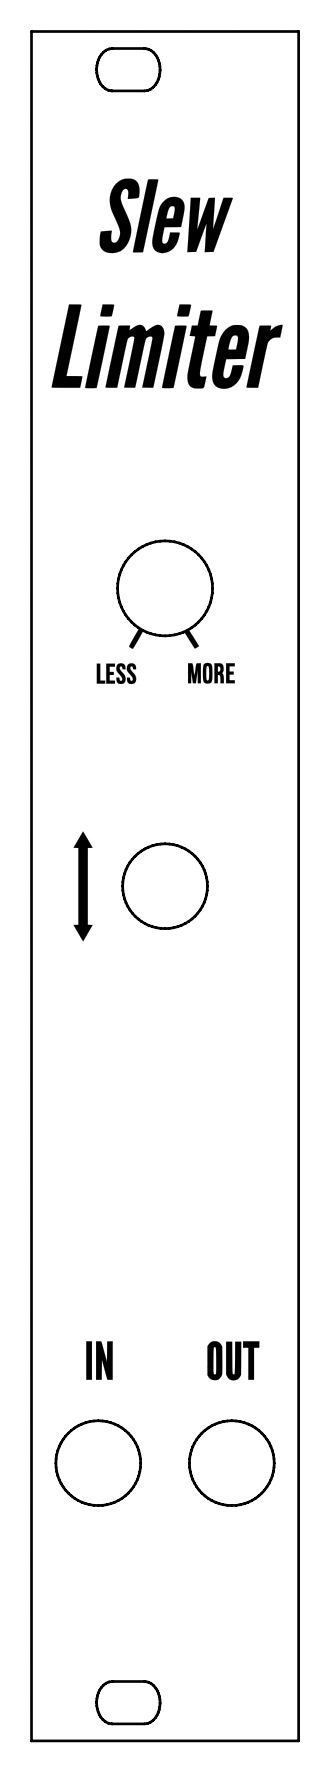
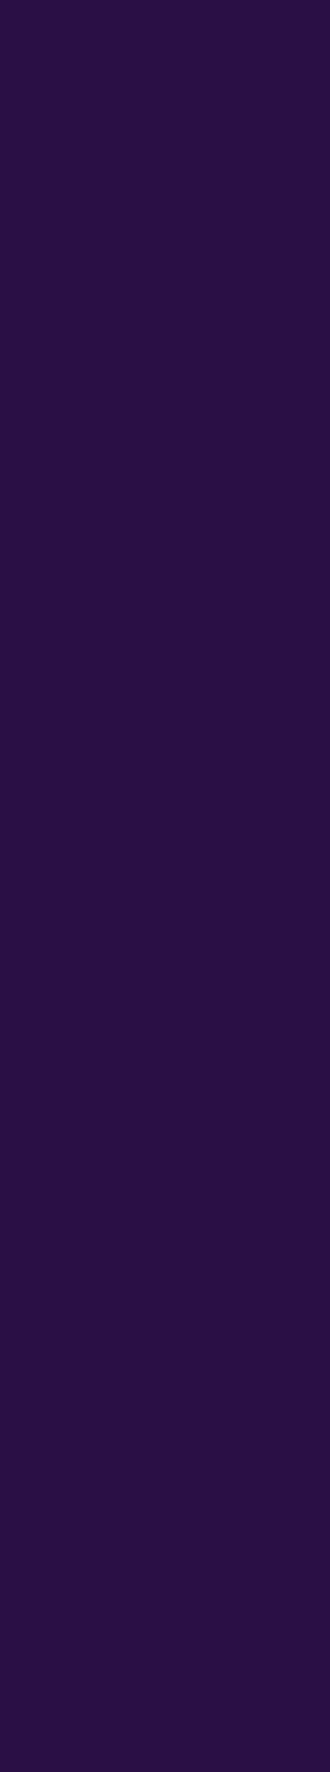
board edge: (31, 31) (298, 31) (298, 1740) (31, 1740) (31, 31) -> none
board edge: (112, 48) (145, 48) (153, 52) (159, 66) (159, 77) (155, 84) (150, 89) (144, 90) (111, 90) (102, 86) (97, 76) (97, 62) (103, 52) (112, 48) -> none
drawing: [51, 178, 283, 1381] -> none
board edge: (165, 540) (146, 544) (131, 554) (121, 569) (117, 588) (121, 606) (131, 621) (146, 632) (165, 635) (183, 632) (198, 621) (208, 606) (212, 588) (208, 569) (198, 554) (183, 544) (165, 540) -> none
board edge: (165, 843) (181, 847) (195, 856) (204, 869) (207, 886) (204, 902) (195, 916) (181, 925) (165, 928) (148, 925) (135, 916) (125, 902) (122, 886) (125, 869) (135, 856) (148, 847) (165, 843) -> none
board edge: (98, 1420) (114, 1424) (128, 1433) (137, 1446) (140, 1463) (137, 1479) (128, 1493) (114, 1502) (98, 1505) (81, 1502) (68, 1493) (59, 1479) (55, 1463) (59, 1446) (68, 1433) (81, 1424) (98, 1420) -> none
board edge: (231, 1420) (248, 1424) (261, 1433) (270, 1446) (274, 1463) (270, 1479) (261, 1493) (248, 1502) (231, 1505) (215, 1502) (201, 1493) (192, 1479) (189, 1463) (192, 1446) (201, 1433) (215, 1424) (231, 1420) -> none
board edge: (112, 1681) (145, 1681) (153, 1685) (159, 1699) (159, 1709) (155, 1717) (150, 1722) (144, 1723) (111, 1723) (102, 1719) (97, 1709) (97, 1695) (103, 1685) (112, 1681) -> none

